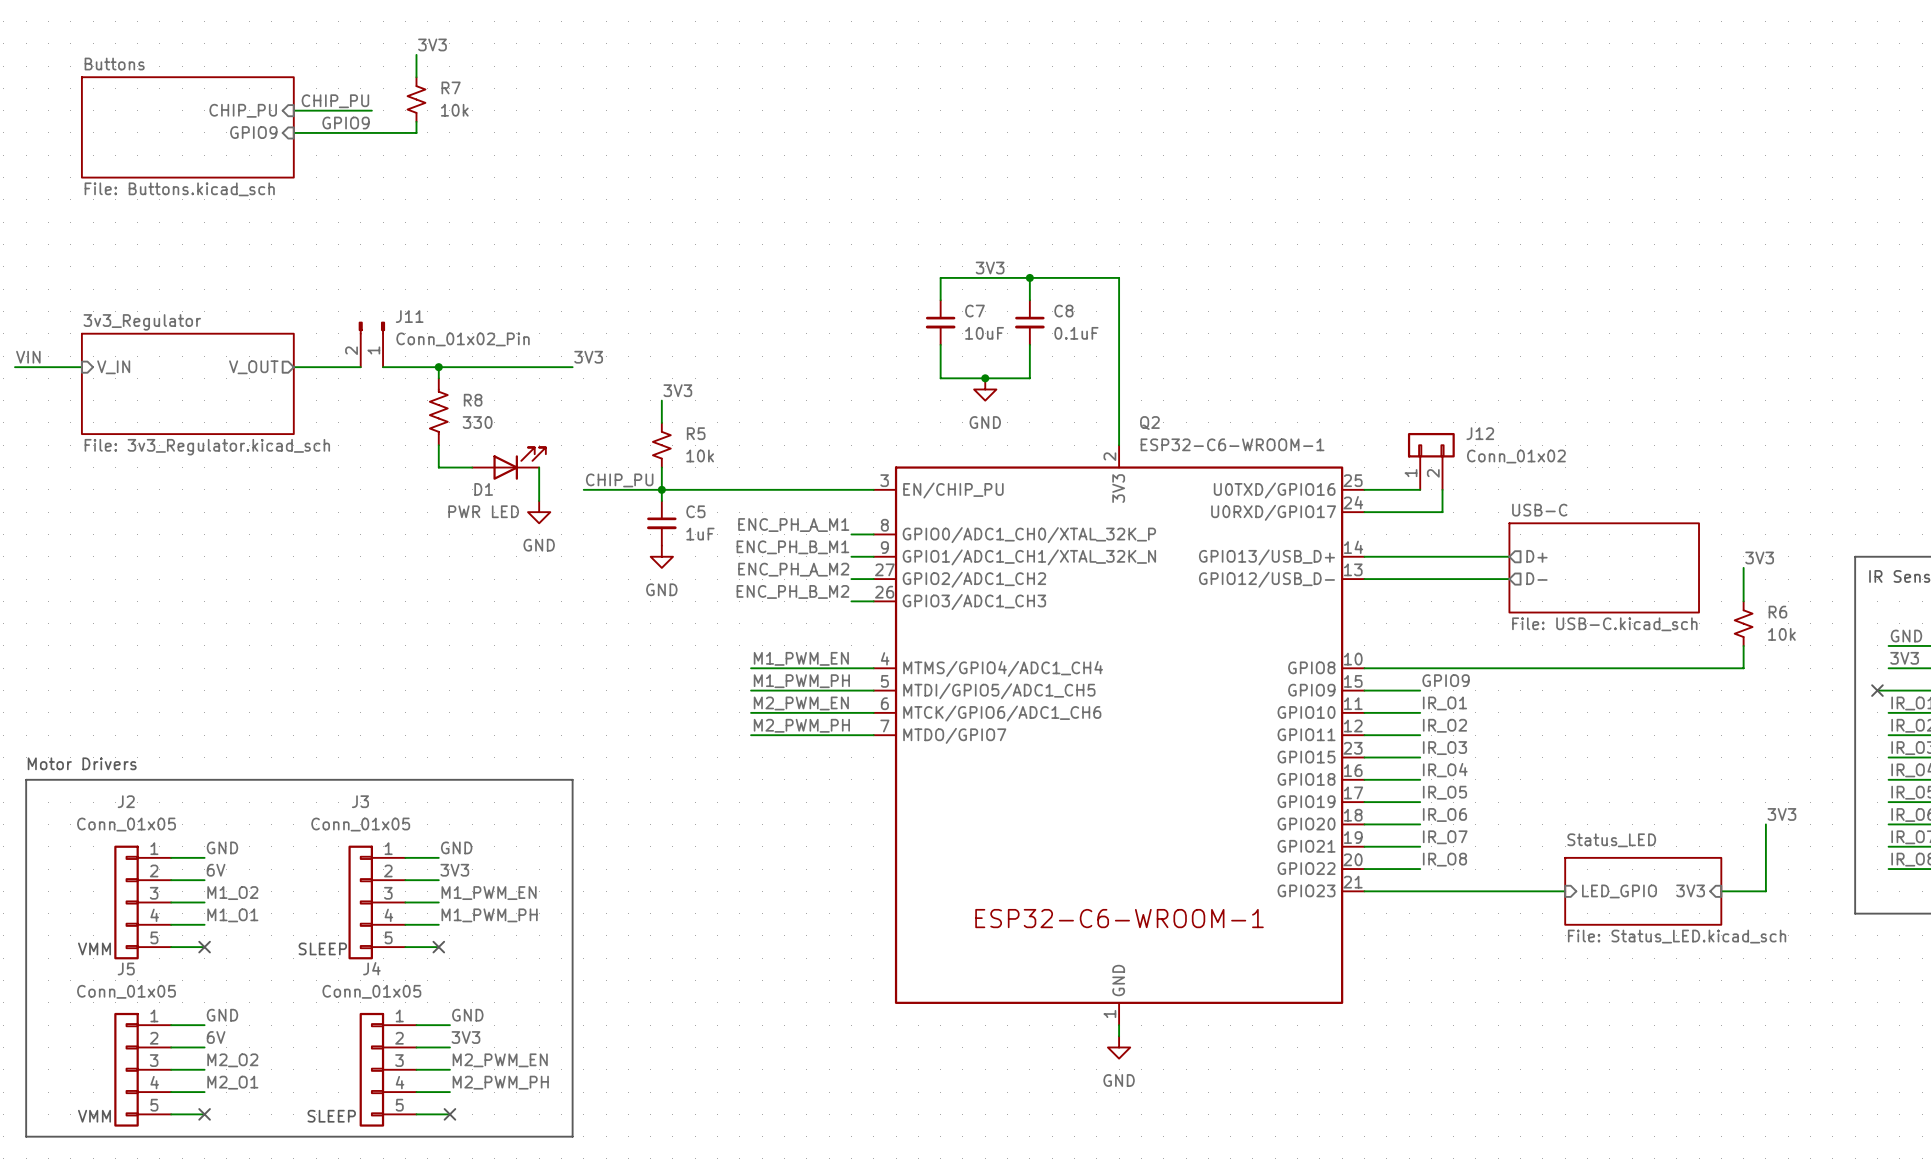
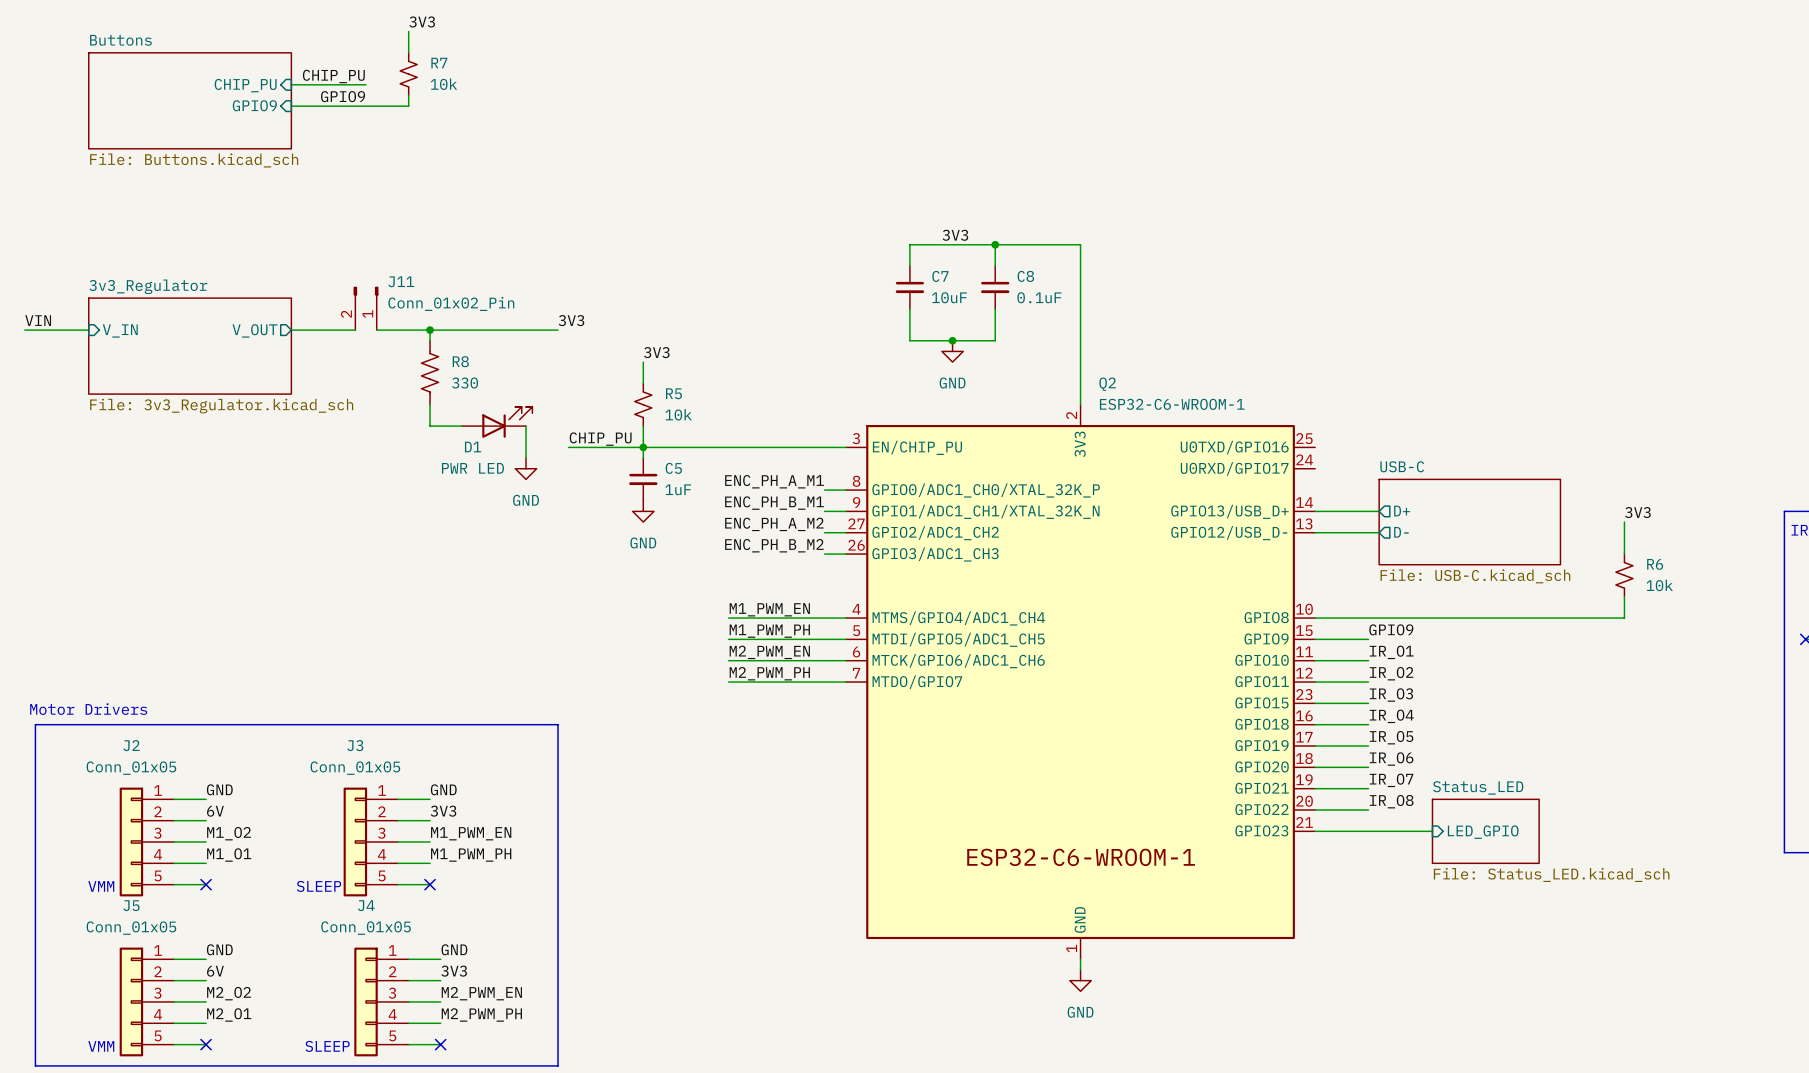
J12: Conn_01x02 (1431, 461) -> none
wire: (1364, 489) (1420, 489) -> none
wire: (1442, 489) (1442, 512) (1364, 512) -> none
wire: (1431, 556) (1509, 556) -> none
sheet pin position: D+ (1536, 556) -> D+ (1402, 510)
label position: 3V3 (1759, 557) -> 3V3 (1637, 512)
sheet USB-C position: (1604, 567) -> (1469, 522)
wire: (1743, 567) (1743, 601) -> (1624, 522) (1624, 554)
sheet pin position: D- (1536, 578) -> D- (1401, 532)
wire: (1431, 579) (1509, 579) -> none
R6 position: (1743, 623) -> (1624, 575)
wire: (1743, 645) (1743, 668) (1687, 668) -> (1624, 596) (1624, 618)
label: 3V3 (1781, 814) -> none
wire: (1765, 824) (1765, 891) (1721, 891) -> none
sheet pin: 3V3 (1690, 890) -> none
wire: (1487, 891) (1565, 891) -> none
sheet Status_LED: none -> File: Status_LED.kicad_sch (1485, 831)
sheet pin position: LED_GPIO (1619, 891) -> LED_GPIO (1483, 832)
sheet Status_LED: File: Status_LED.kicad_sch (1643, 891) -> none

